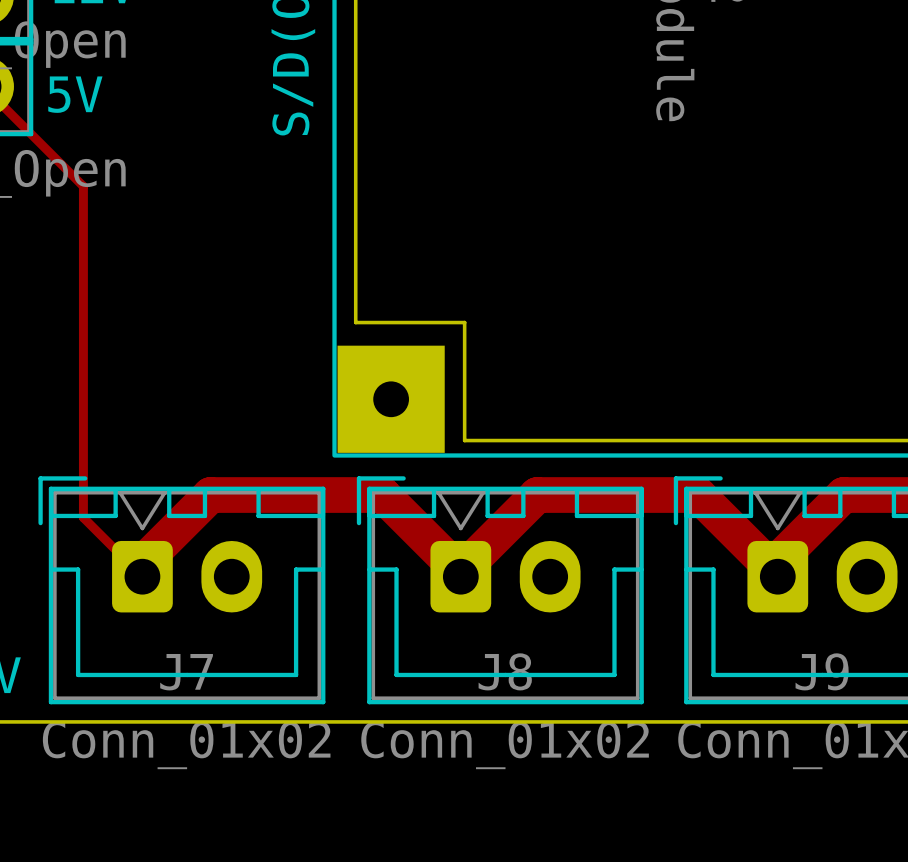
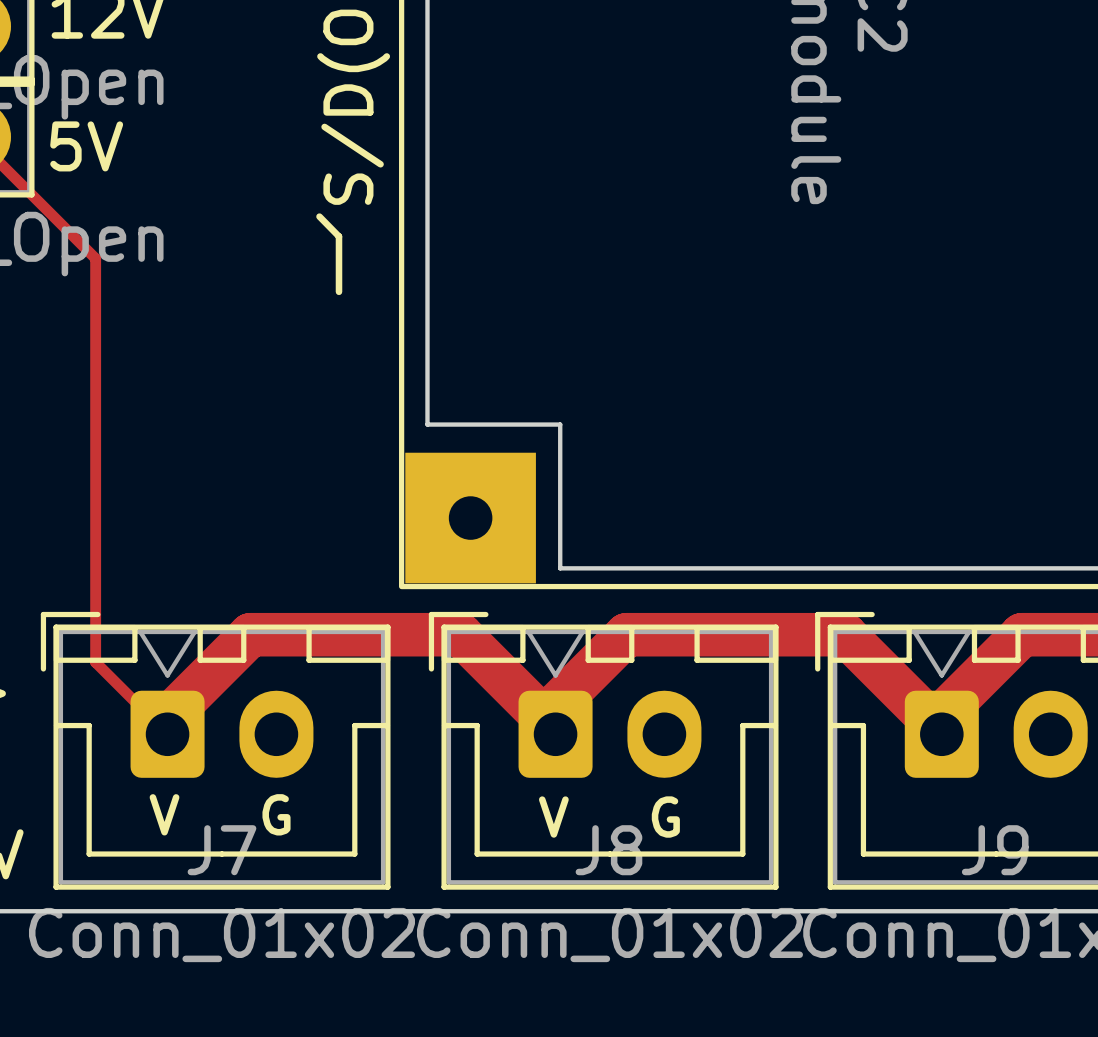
line: none -> (319, 216) (339, 236) (339, 291)
track: (537, 495) (460, 571) -> (648, 634) (626, 634) (555, 705) (555, 727)
text: none -> V G (220, 814)
text: none -> V G (609, 817)

